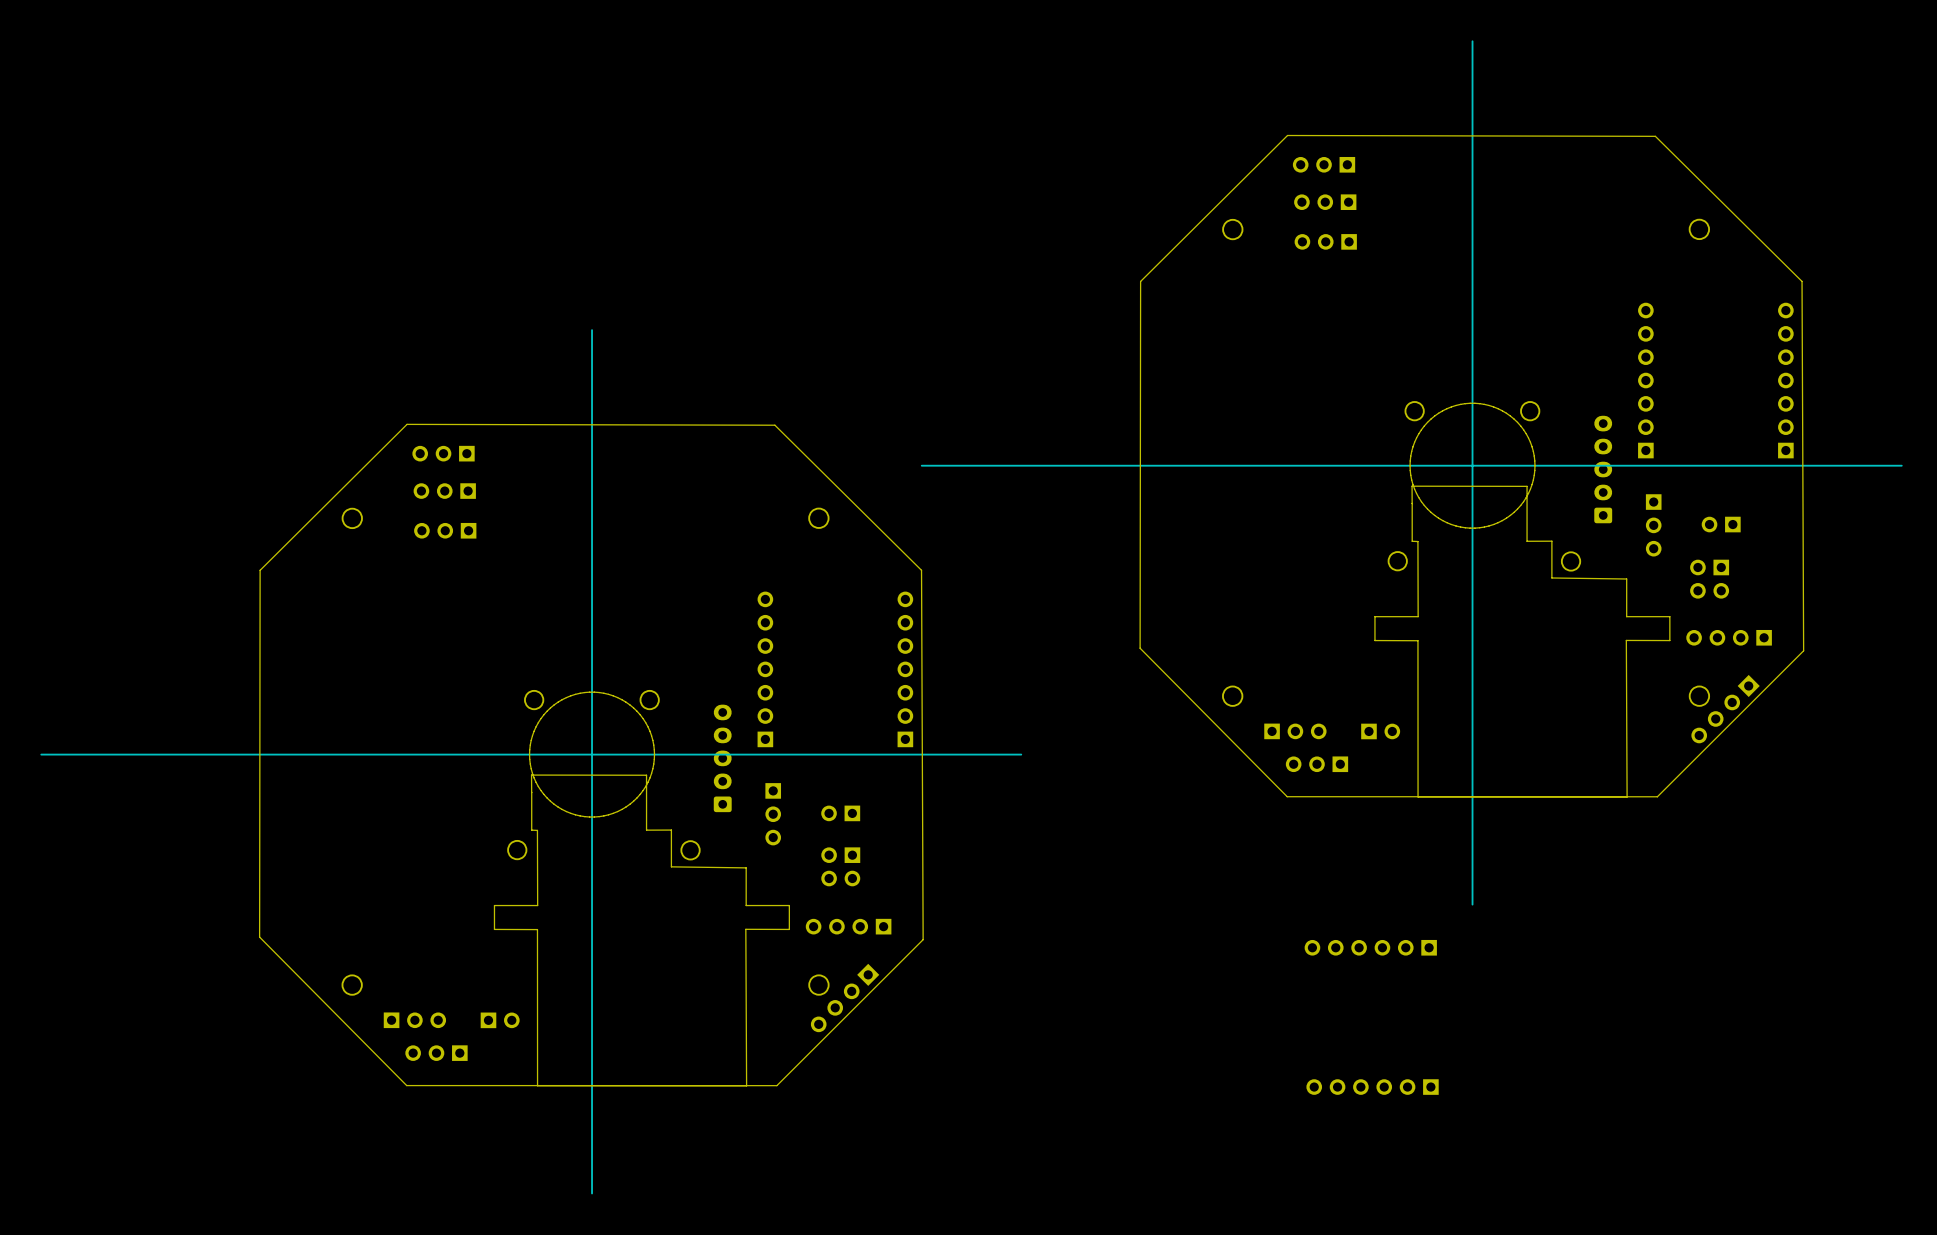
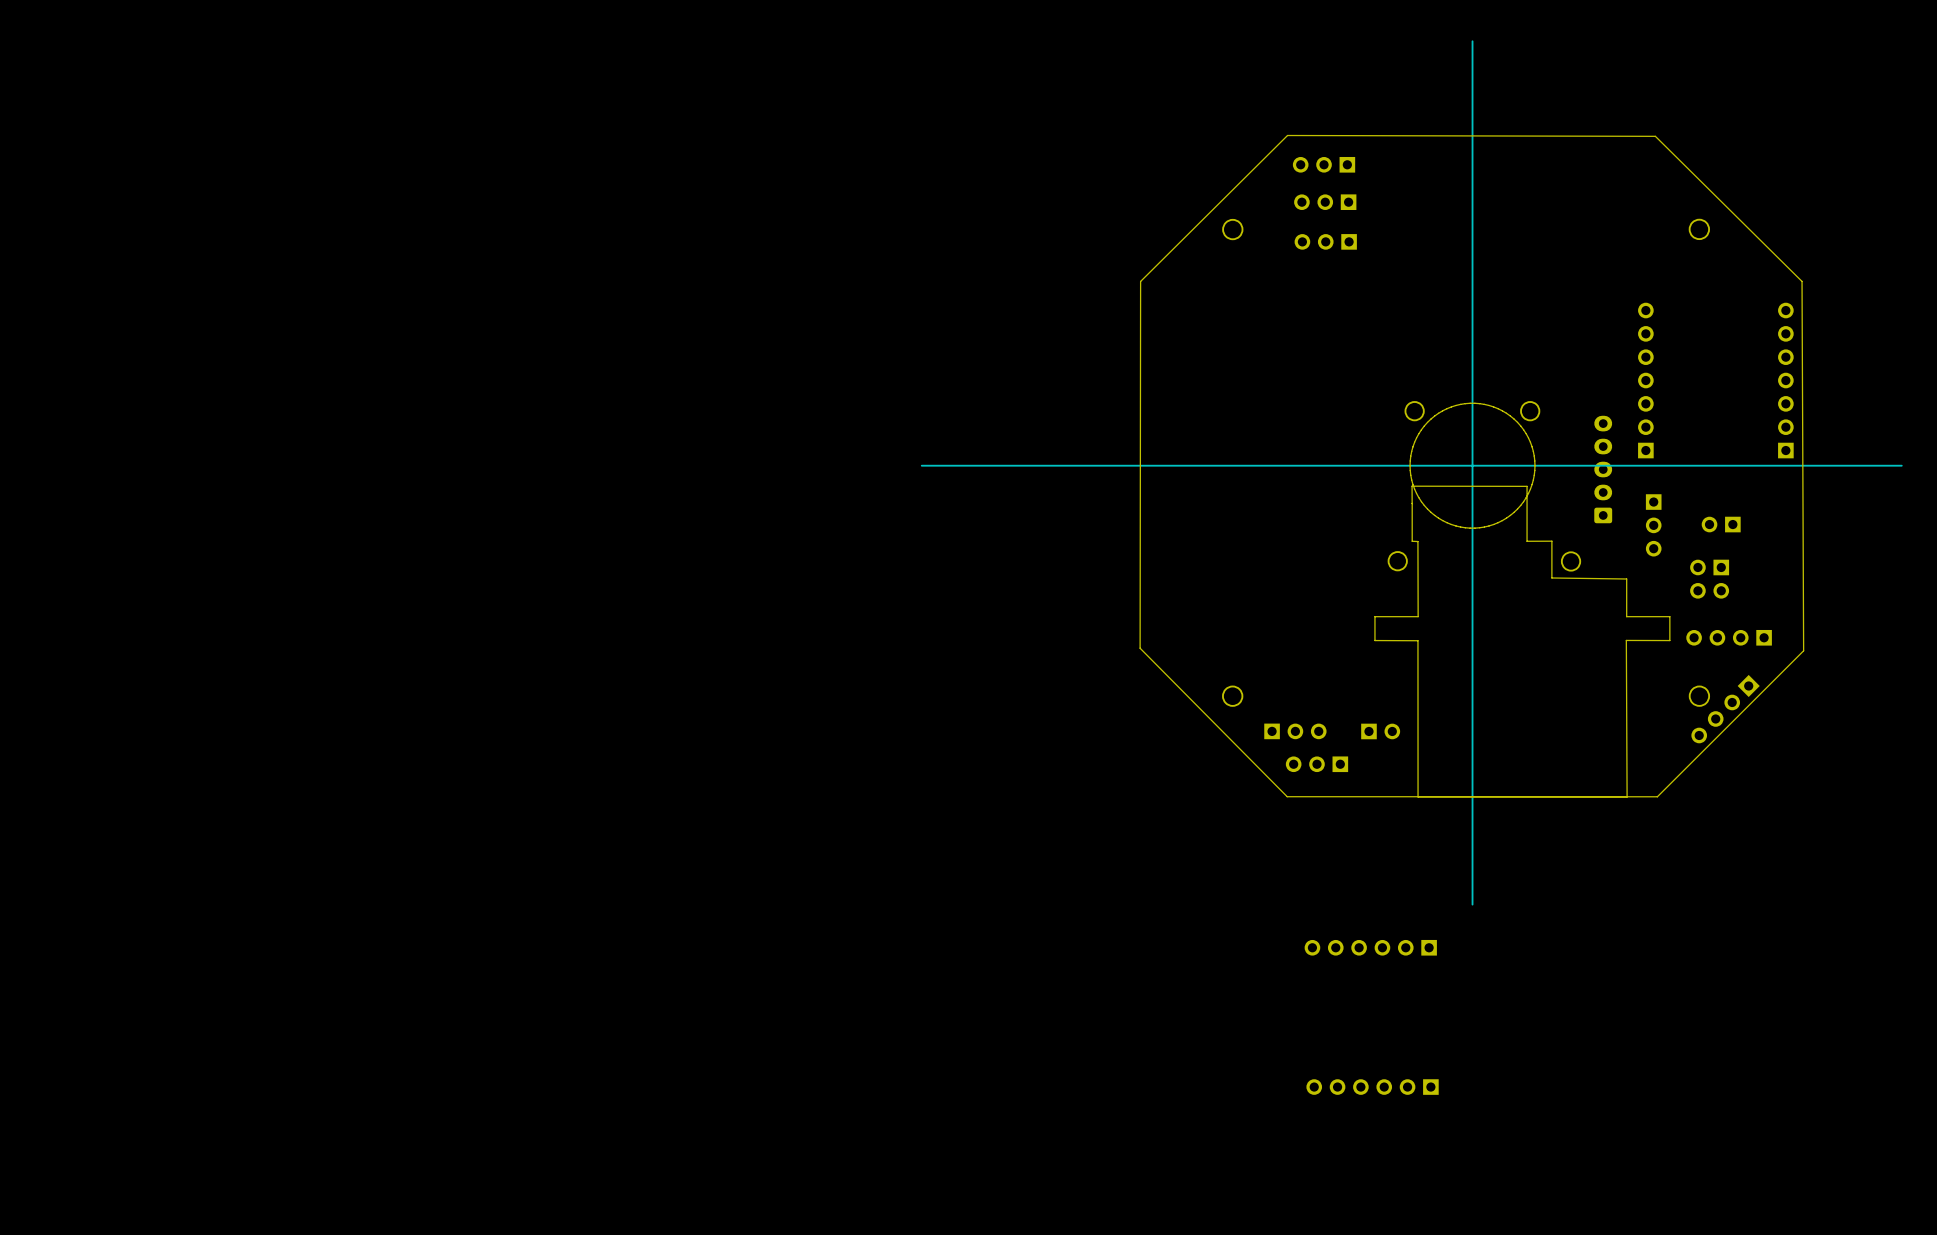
line: (592, 330) (592, 1193) -> none
board edge: (407, 424) (774, 425) (921, 570) (923, 939) (776, 1085) (406, 1085) (259, 937) (260, 570) (407, 424) -> none
part: (443, 453) -> none
part: (444, 491) -> none
round board edge: [341, 507, 363, 530] -> none
round board edge: [808, 507, 830, 529] -> none
part: (445, 530) -> none
part: (765, 669) -> none
part: (905, 669) -> none
round board edge: [524, 689, 545, 711] -> none
round board edge: [639, 689, 660, 711] -> none
board edge: (594, 692) (617, 697) (637, 711) (649, 731) (654, 754) (649, 777) (643, 790) (633, 801) (613, 813) (589, 817) (566, 811) (547, 797) (534, 777) (529, 754) (534, 731) (540, 718) (550, 707) (570, 695) (594, 692) -> none
line: (1021, 754) (41, 754) -> none
part: (722, 758) -> none
board edge: (531, 775) (531, 830) (537, 830) (537, 905) (494, 905) (494, 929) (537, 929) (537, 1085) (746, 1085) (745, 929) (789, 929) (789, 905) (746, 905) (746, 867) (671, 866) (671, 830) (646, 830) (646, 775) (531, 775) -> none
part: (840, 813) -> none
part: (773, 814) -> none
round board edge: [507, 839, 528, 861] -> none
round board edge: [680, 840, 701, 861] -> none
part: (840, 866) -> none
part: (848, 926) -> none
round board edge: [341, 974, 363, 996] -> none
round board edge: [808, 974, 830, 996] -> none
part: (845, 997) -> none
part: (414, 1020) -> none
part: (500, 1020) -> none
part: (436, 1053) -> none

